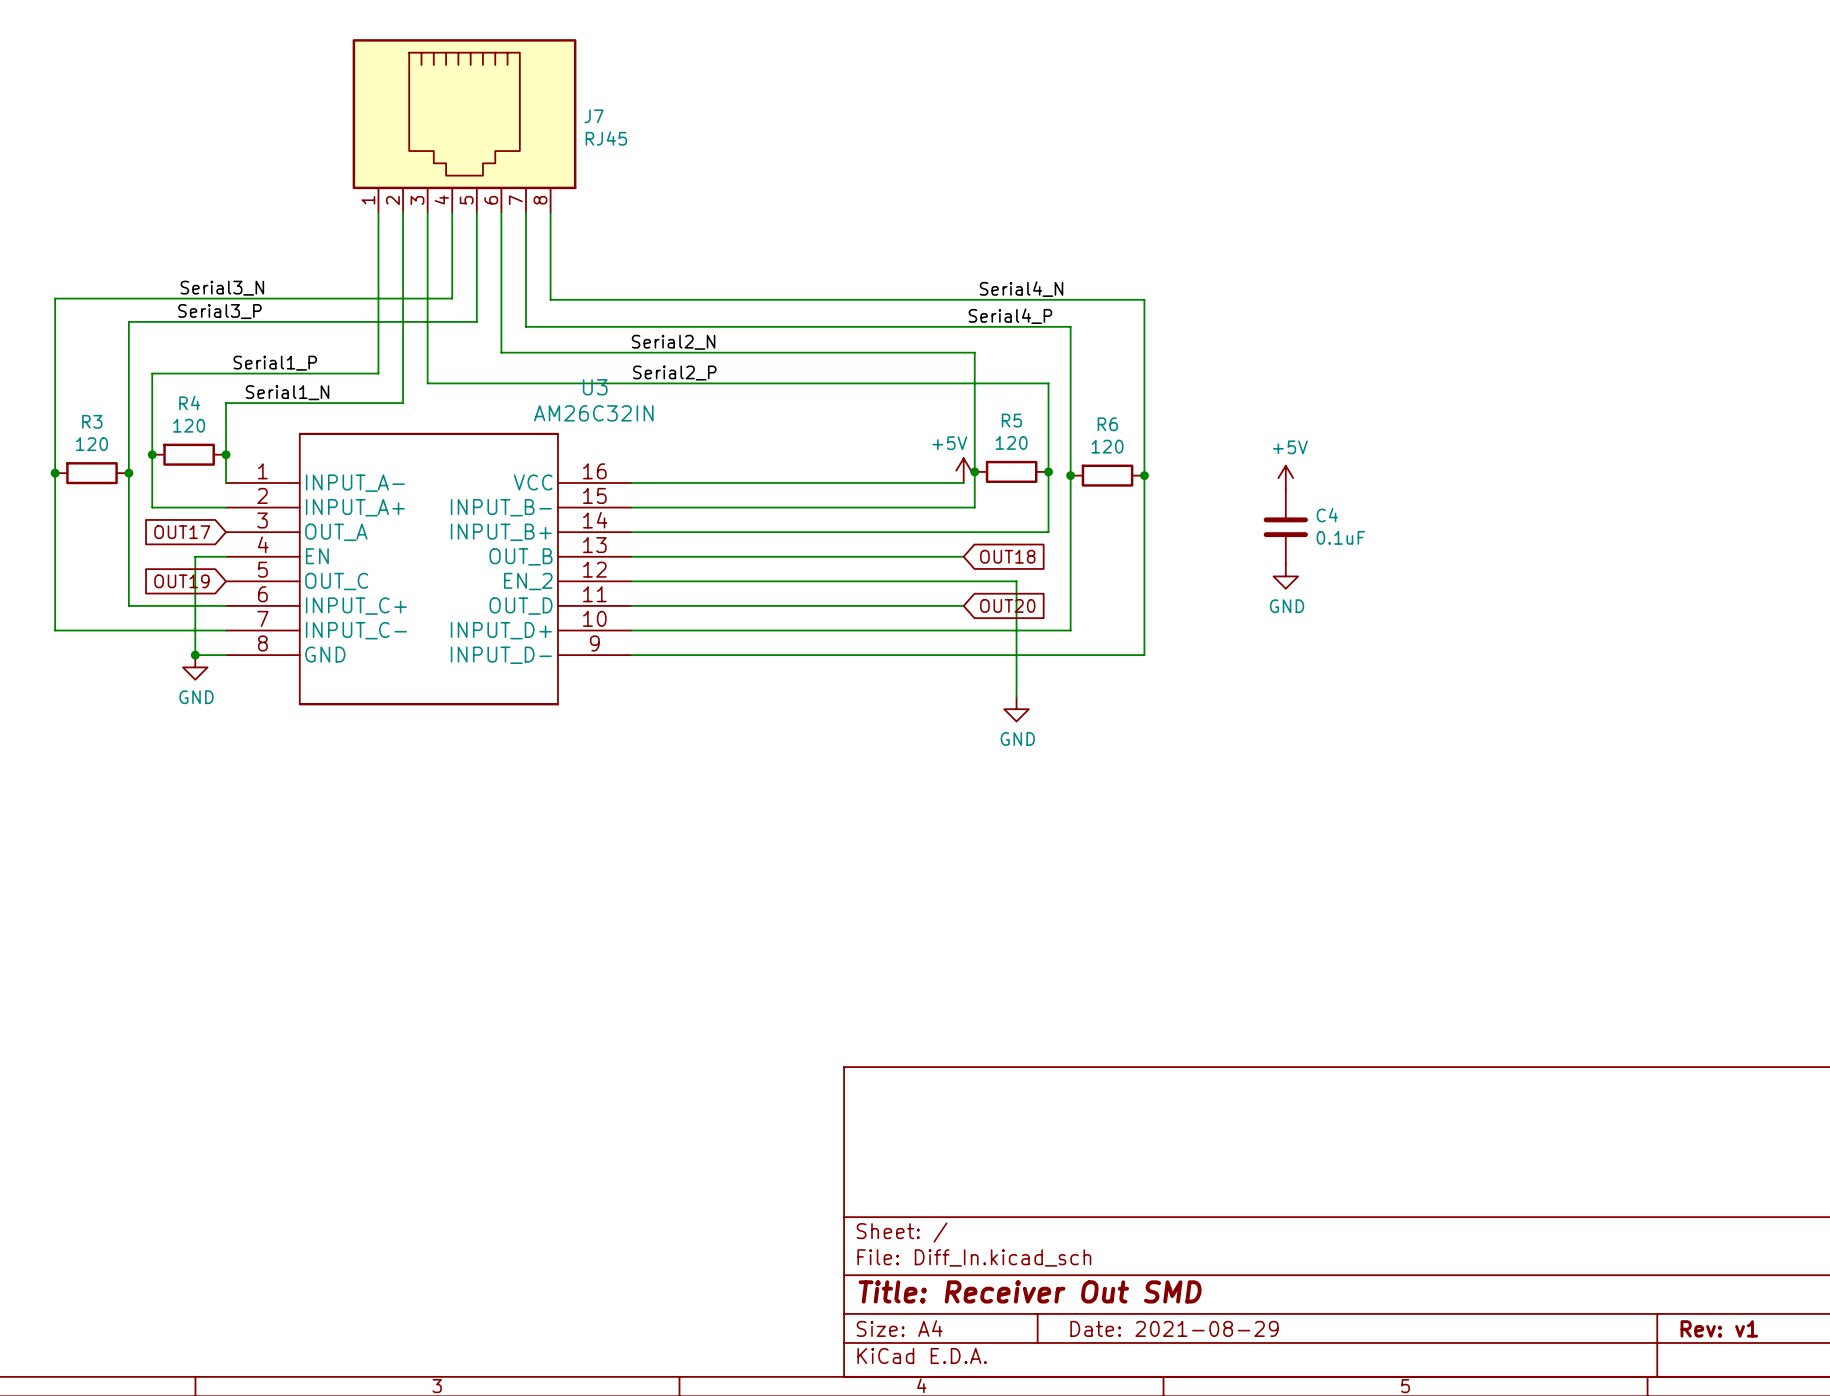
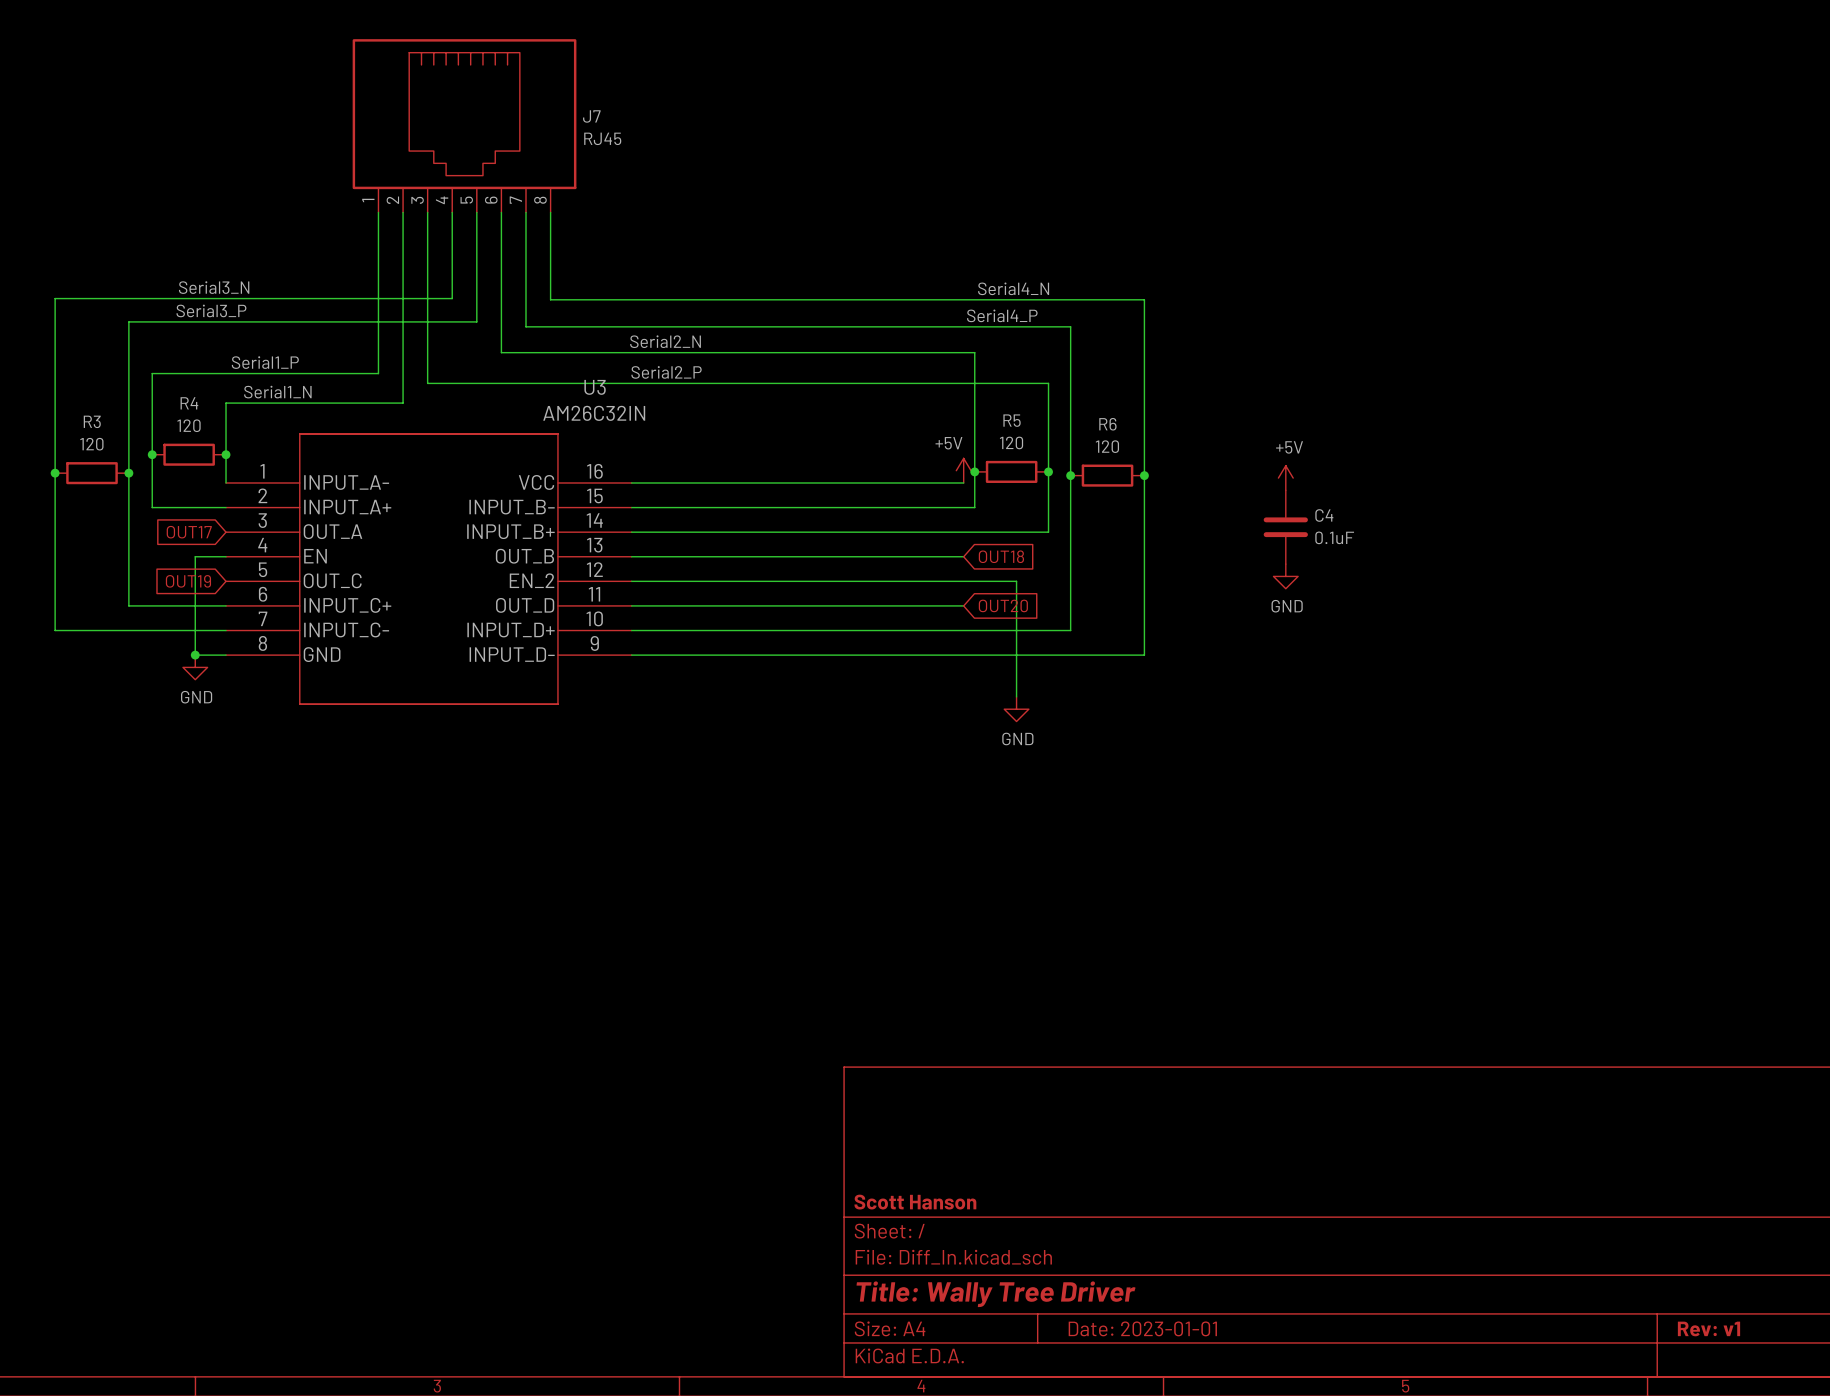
title block: none -> Scott Hanson (915, 1202)
title block: Title: Receiver Out SMD (1030, 1291) -> Title: Wally Tree Driver (996, 1294)
title block: Date: 2021-08-29 (1174, 1328) -> Date: 2023-01-01 (1142, 1328)

